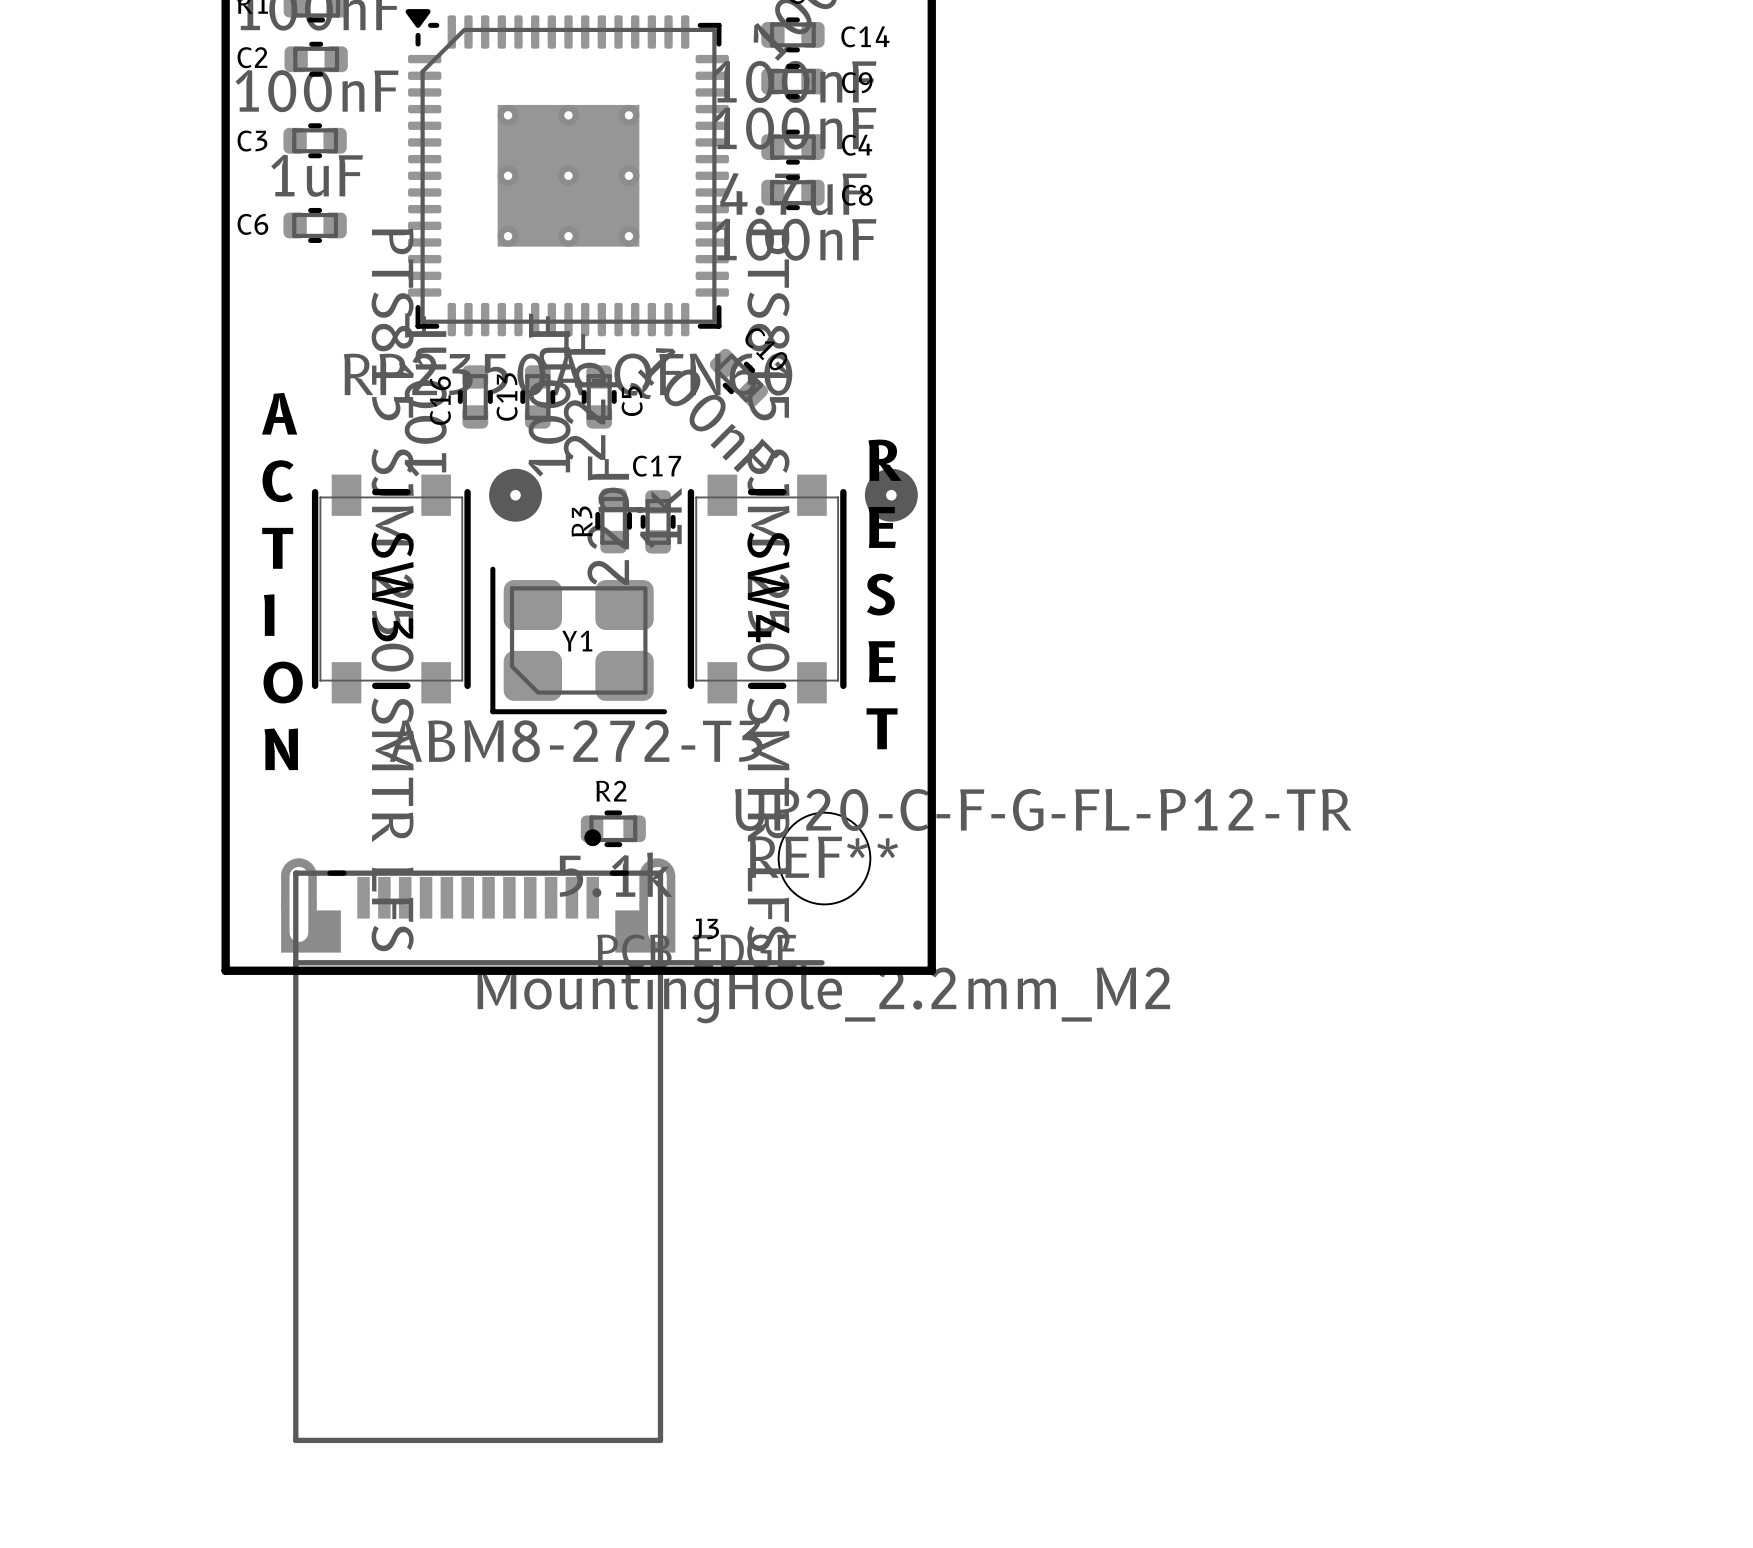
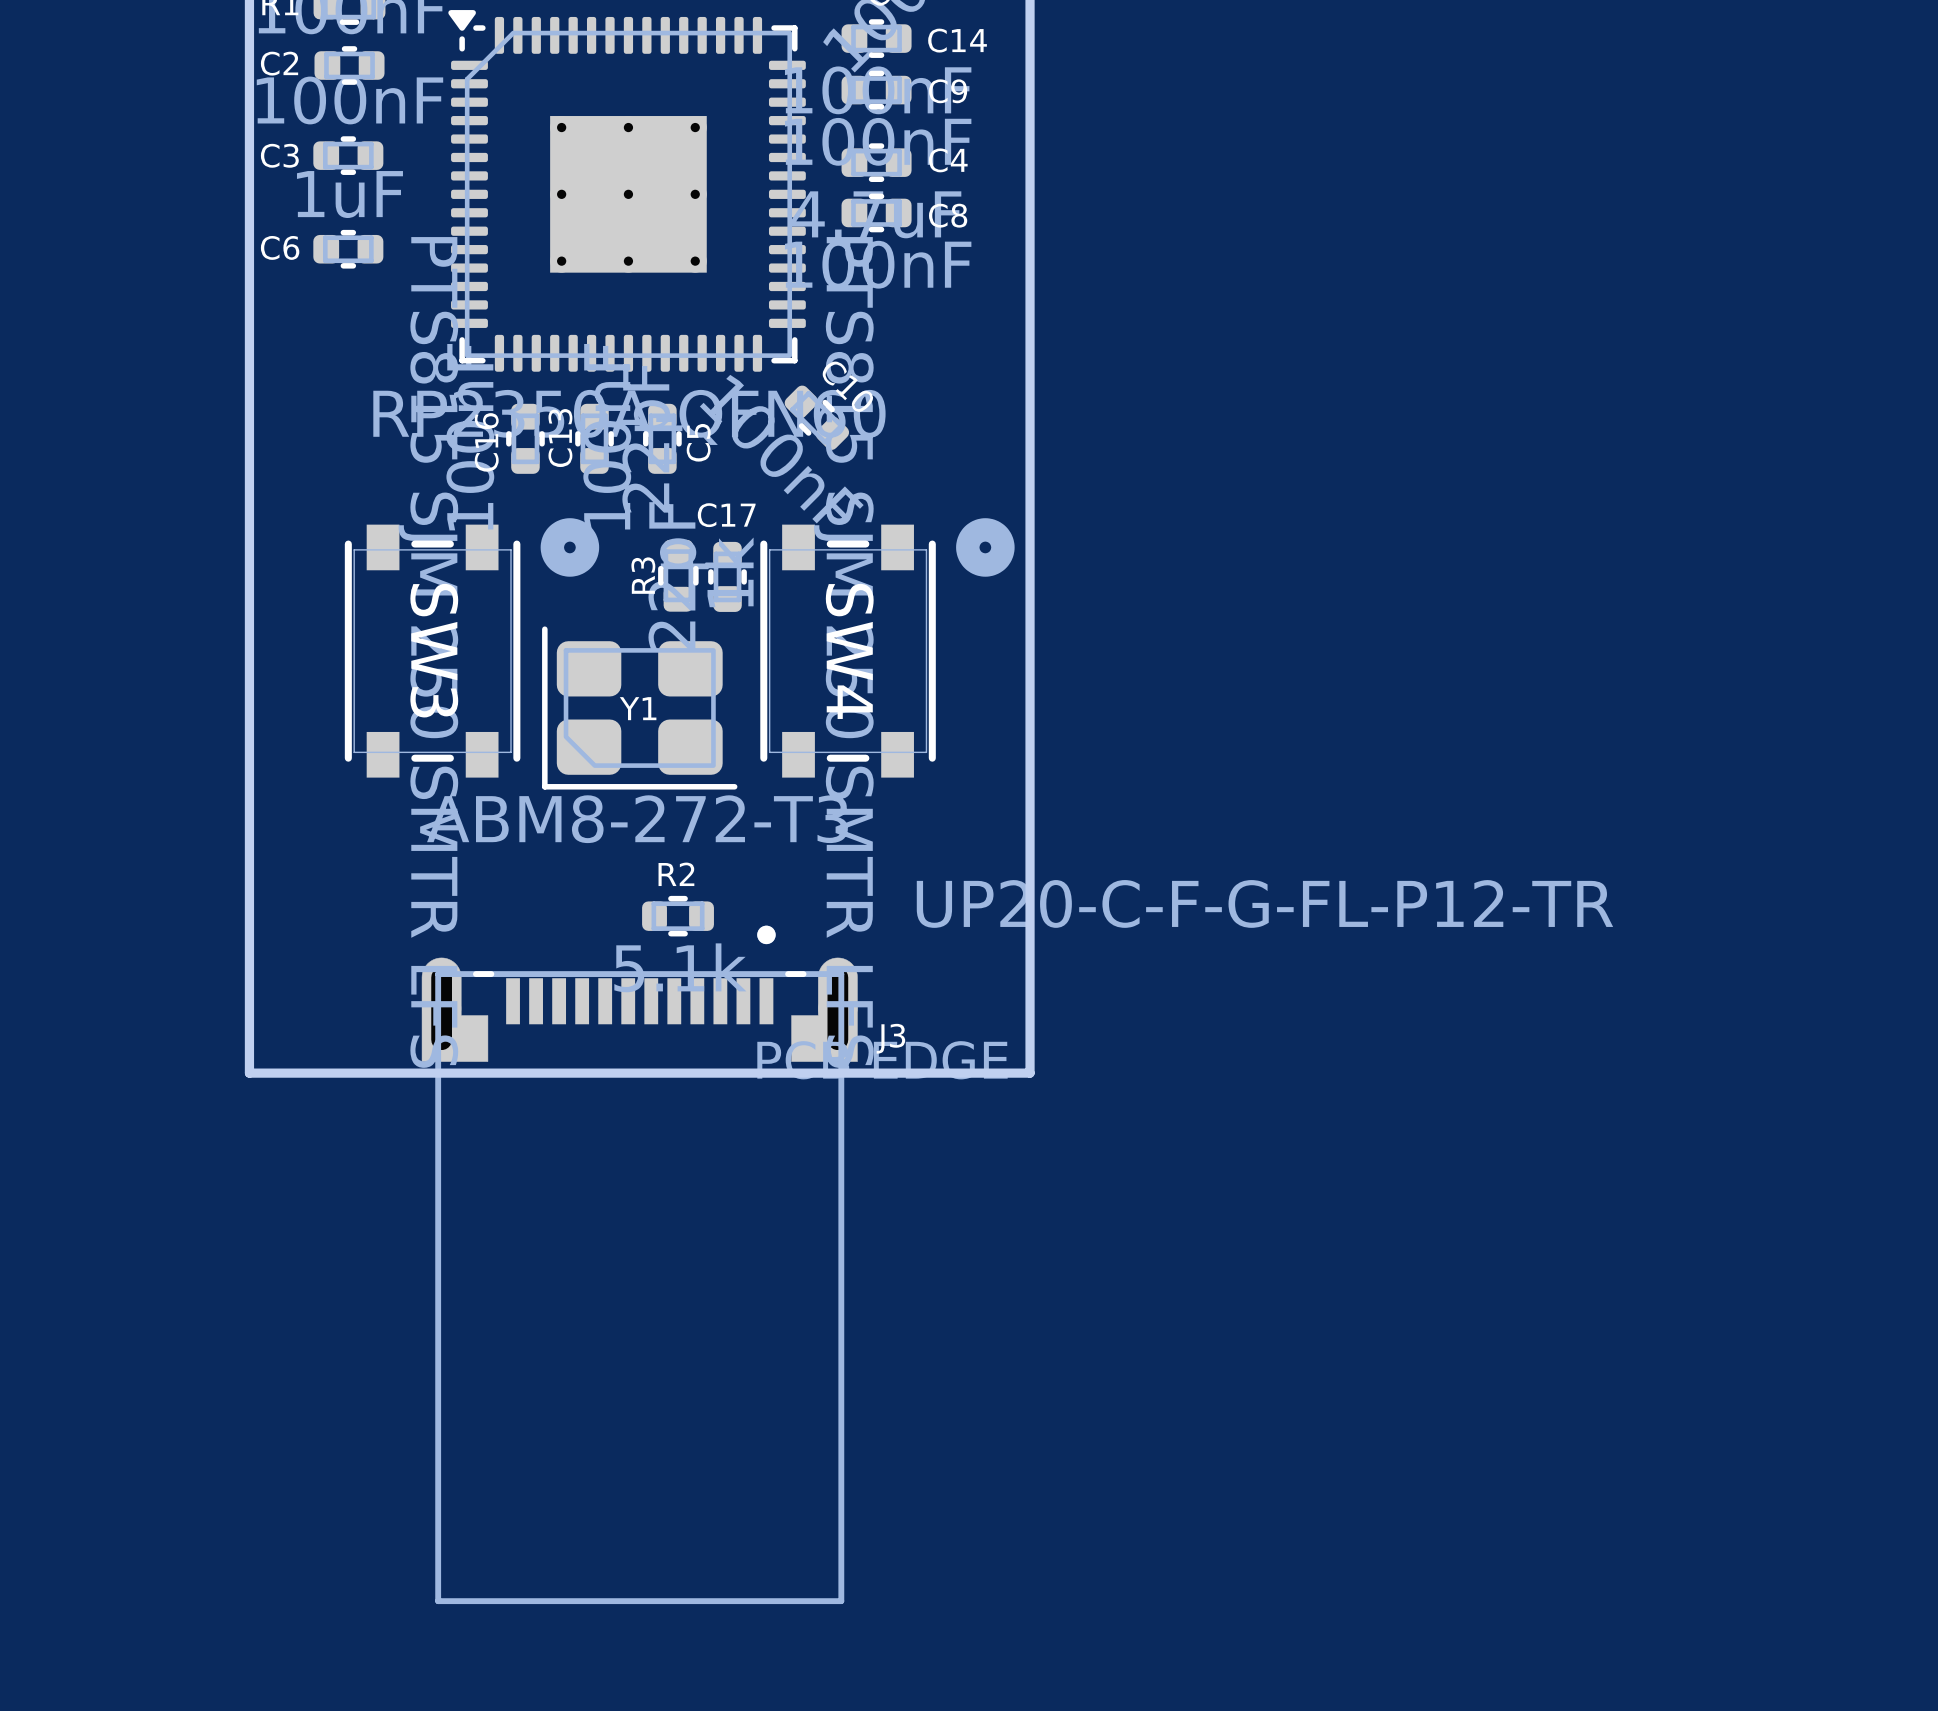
text: A (279, 413) -> none
text: R (885, 460) -> none
text: C (278, 481) -> none
text: E (882, 527) -> none
text: T (277, 548) -> none
text: S (880, 594) -> none
text: I (269, 615) -> none
text: E (882, 661) -> none
text: O (283, 682) -> none
text: T (882, 728) -> none
text: N (281, 749) -> none
REF**: MountingHole_2.2mm_M2 (824, 858) -> none
J3 position: (552, 1136) -> (722, 1264)

